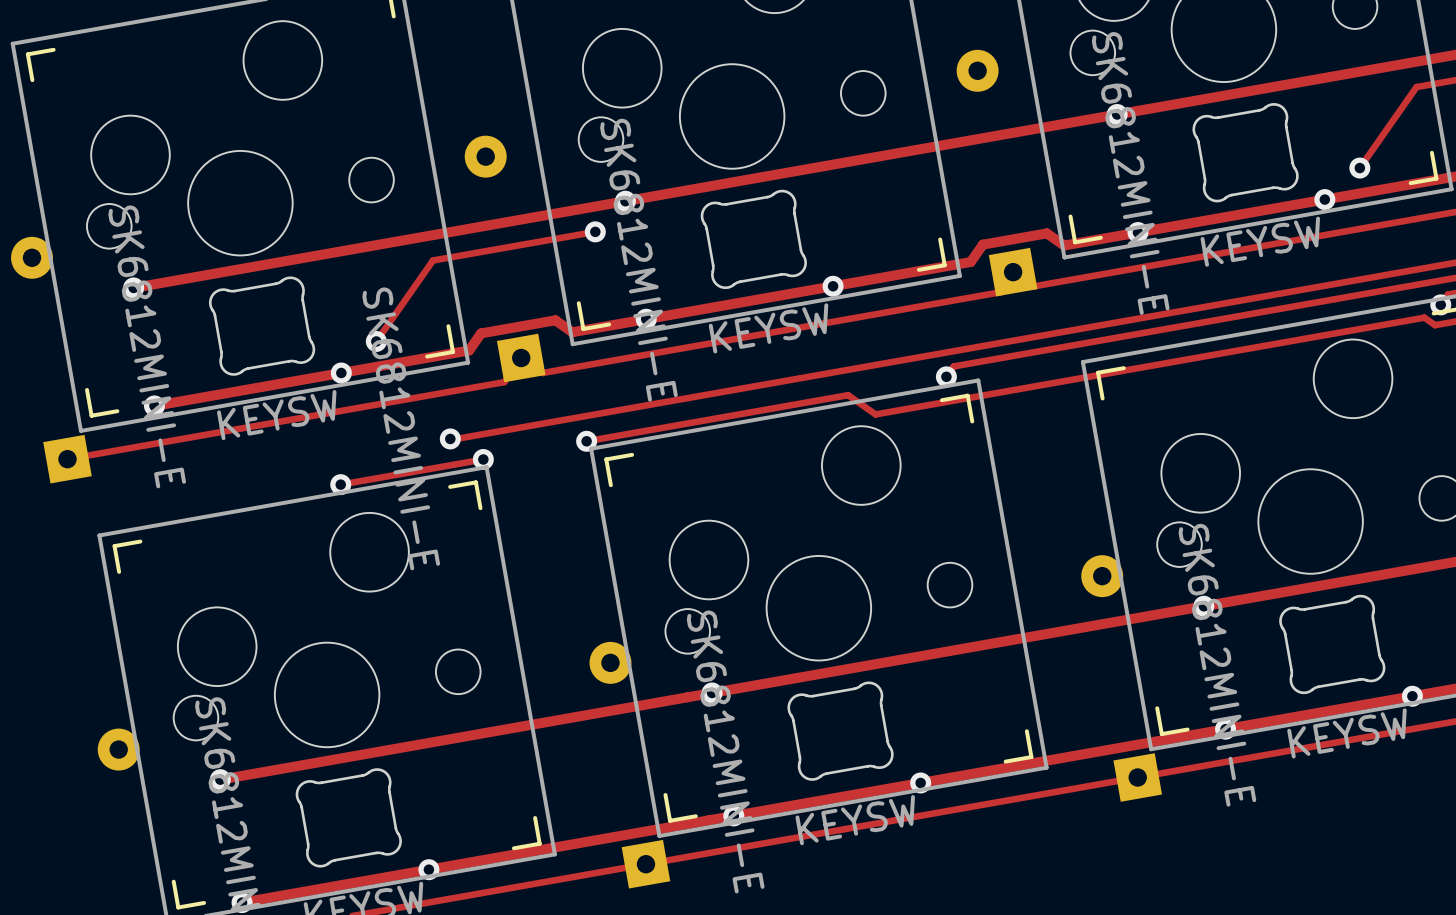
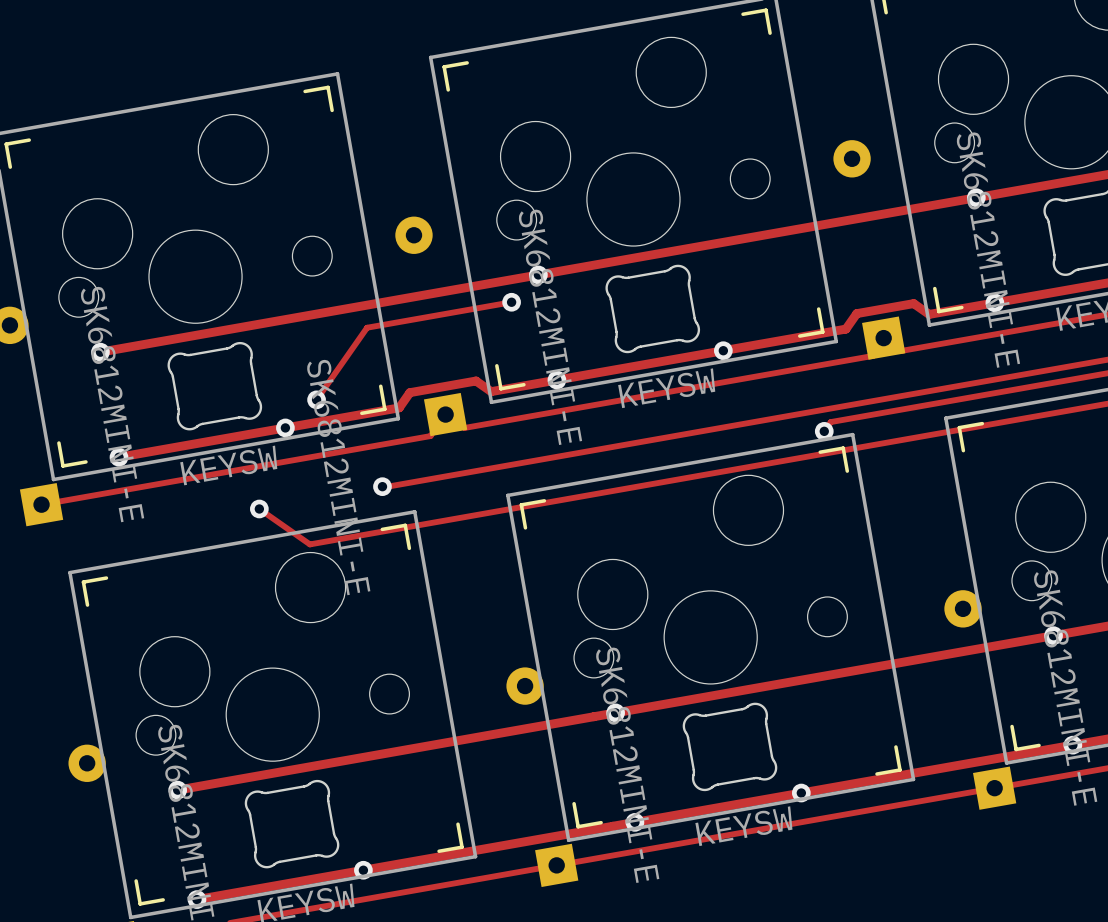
track: (875, 414) (848, 395) (586, 441) -> (761, 464) (309, 544) (259, 508)
via: (586, 441) -> none
track: (483, 459) (340, 484) -> none
via: (483, 459) -> none
via position: (340, 484) -> (259, 508)

